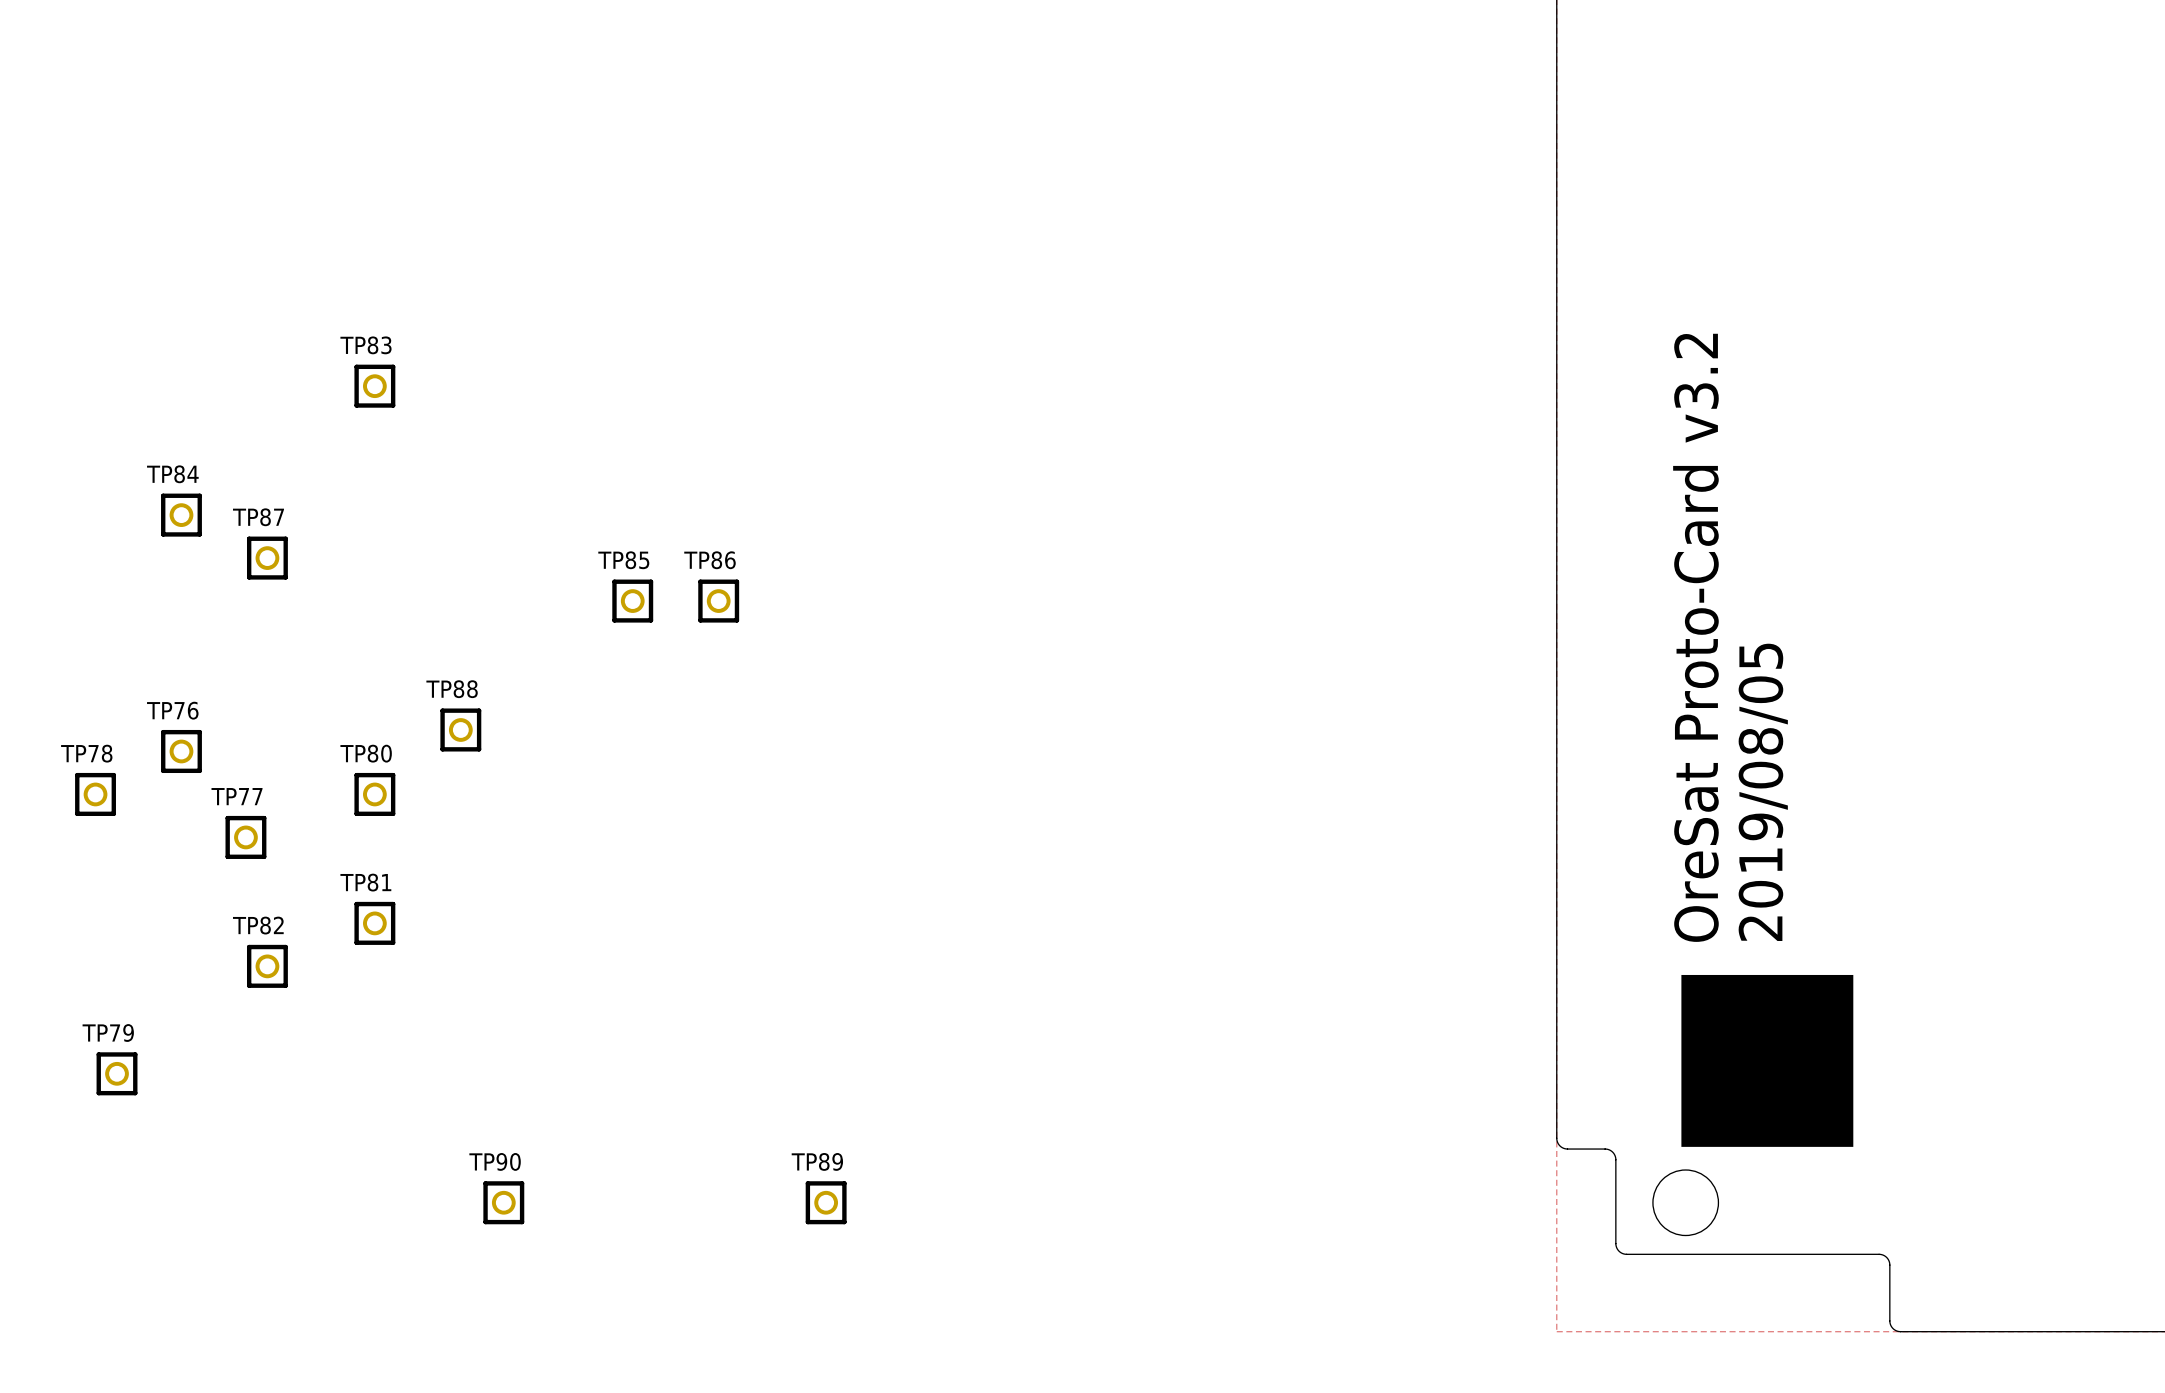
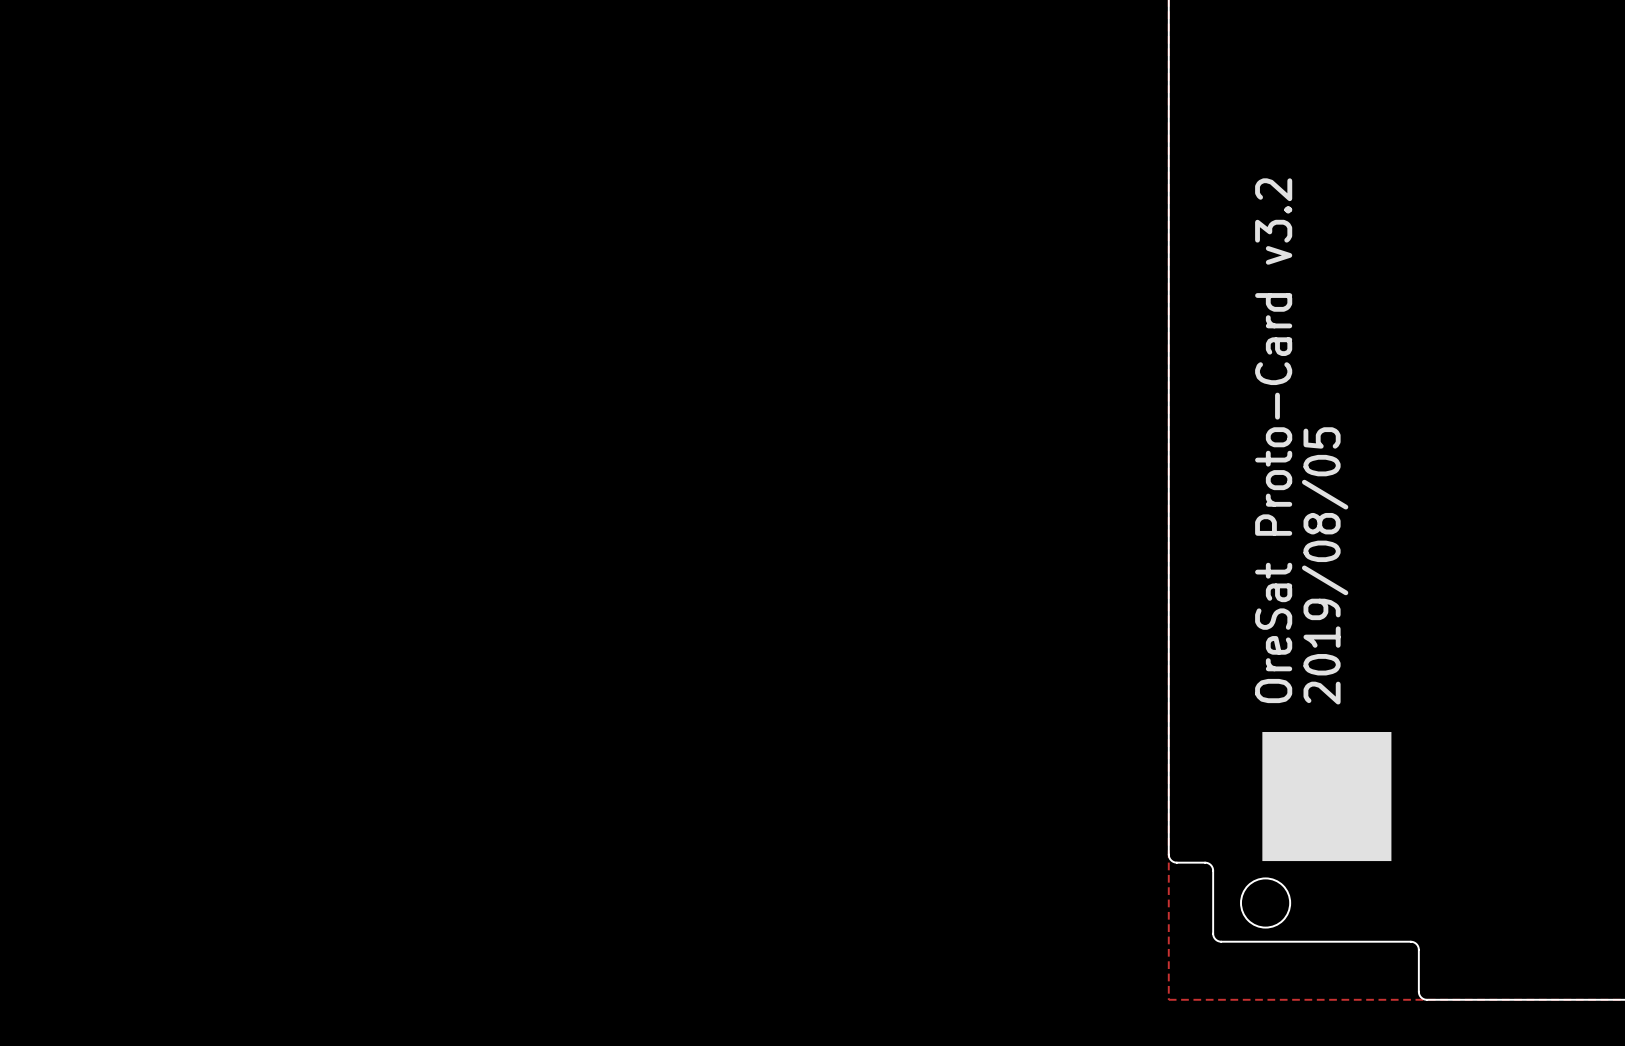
TP83: (374, 386) -> none
TP84: (181, 515) -> none
TP87: (267, 558) -> none
TP85: (632, 601) -> none
TP86: (718, 601) -> none
TP88: (460, 730) -> none
TP76: (181, 751) -> none
TP78: (95, 794) -> none
TP80: (374, 794) -> none
TP77: (245, 837) -> none
TP81: (374, 923) -> none
TP82: (267, 966) -> none
TP79: (117, 1073) -> none
TP90: (503, 1202) -> none
TP89: (826, 1202) -> none

